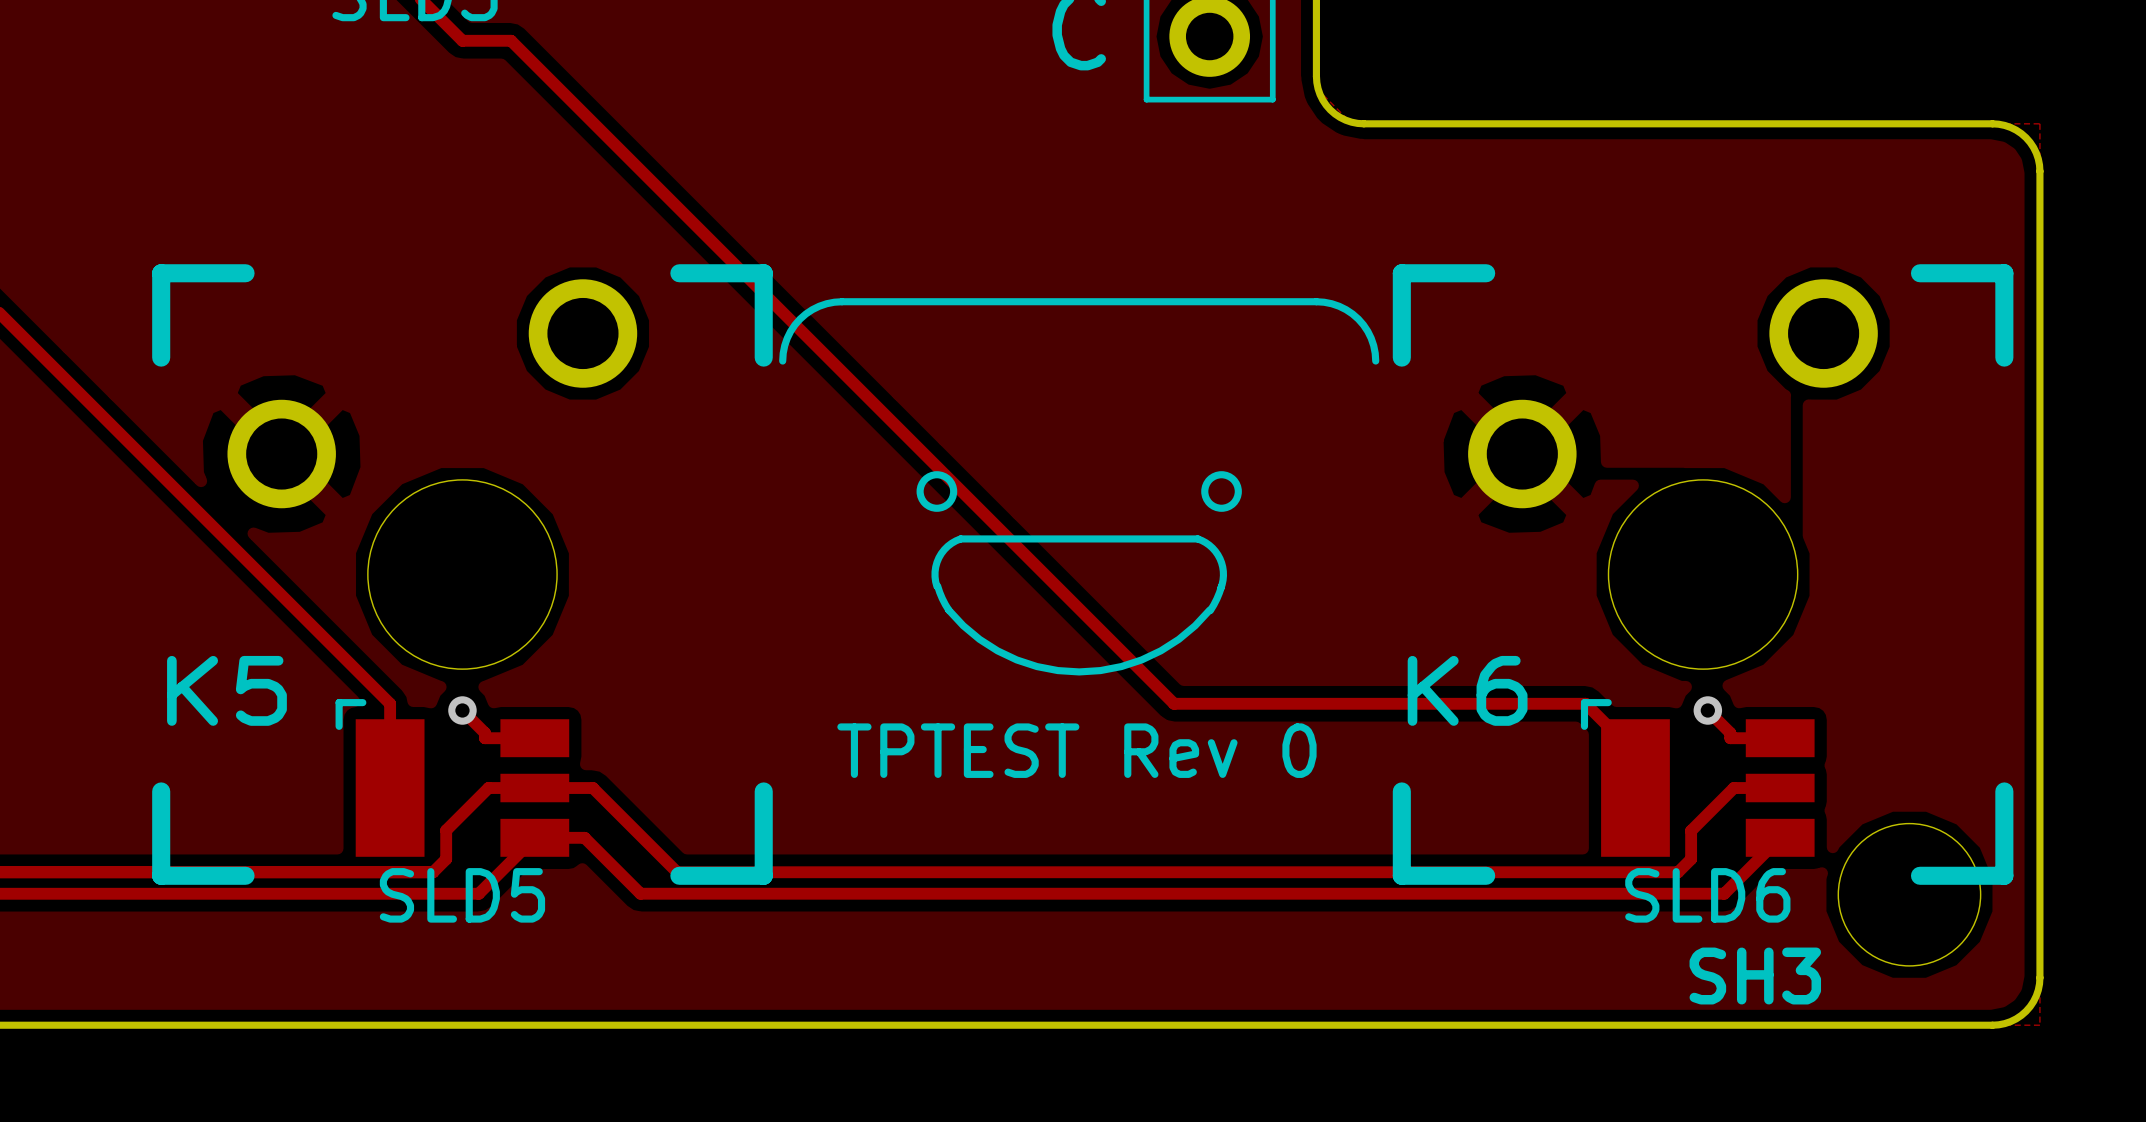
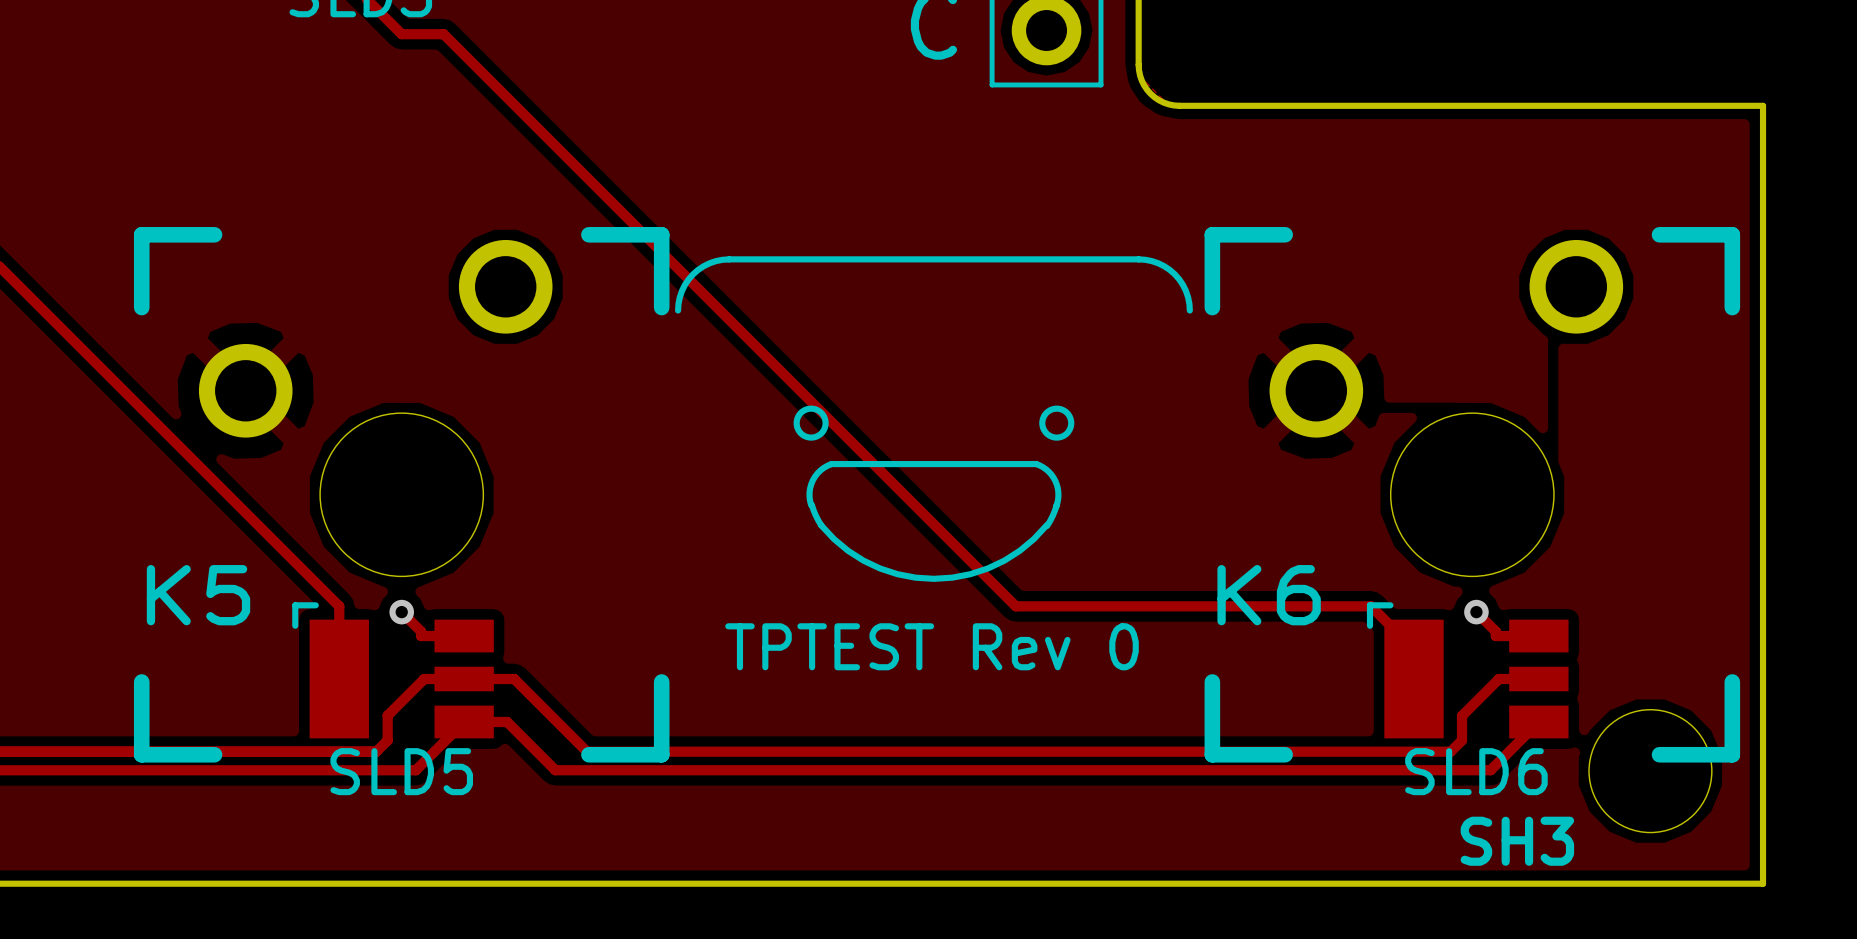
board edge: (1992, 123) (2010, 127) (2026, 137) (2036, 153) (2039, 171) -> (1722, 105) (1763, 105) (1763, 146)
board edge: (2039, 977) (2036, 995) (2026, 1011) (2010, 1021) (1992, 1025) -> (1763, 842) (1763, 883) (1722, 883)

